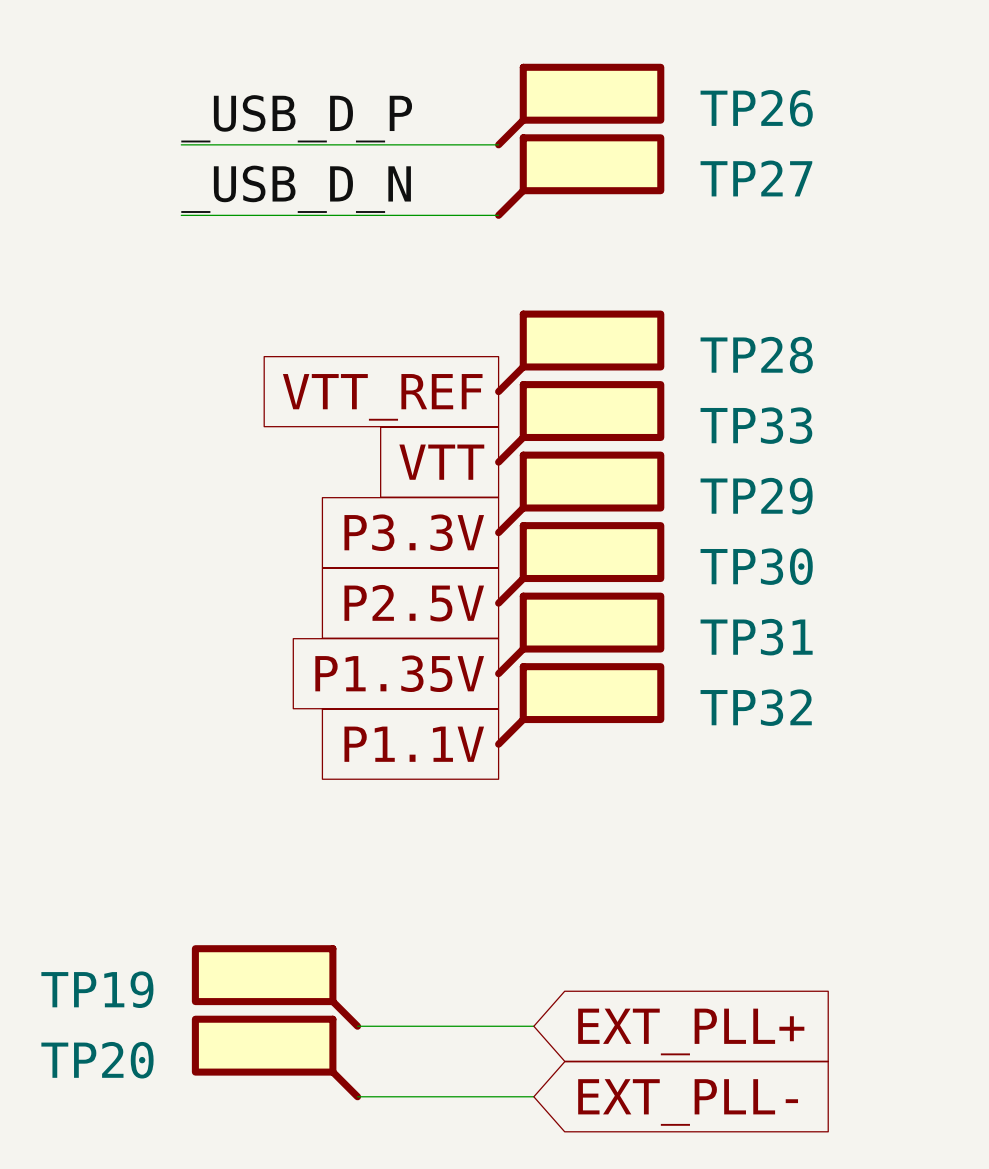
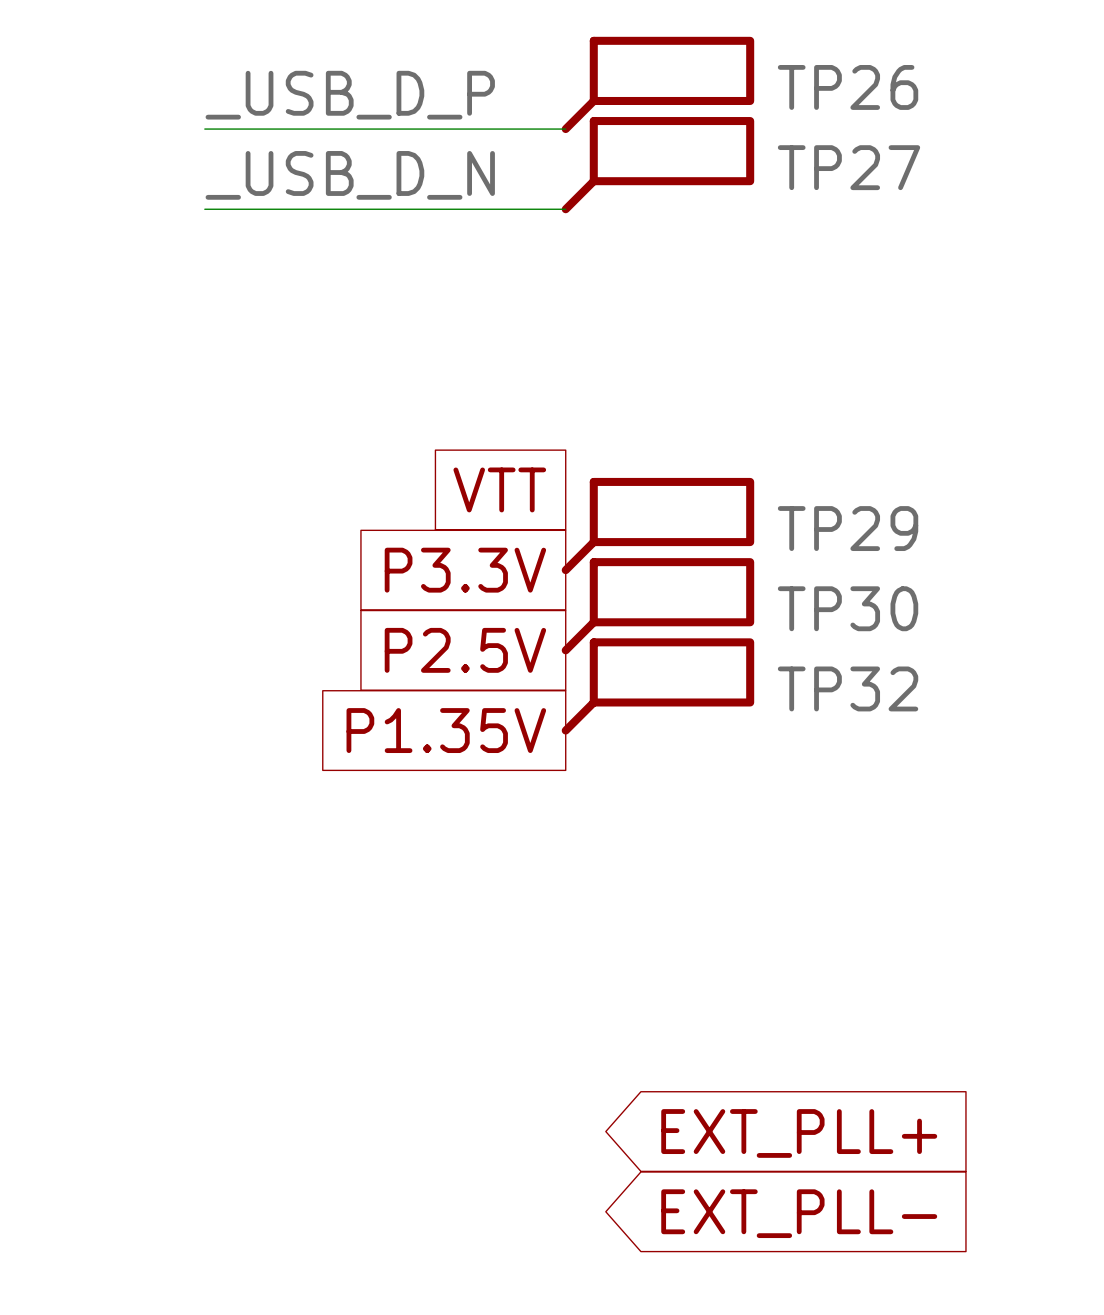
TP28: (579, 352) -> none
global label: VTT_REF (382, 397) -> none
TP33: (579, 423) -> none
TP31 name: TP31 (756, 637) -> TP32 (848, 688)
TP32: (579, 705) -> none
global label: P1.1V (414, 744) -> none
TP19: (276, 987) -> none
wire: (357, 1026) (533, 1026) -> none
TP20: (276, 1058) -> none
wire: (357, 1096) (533, 1096) -> none

